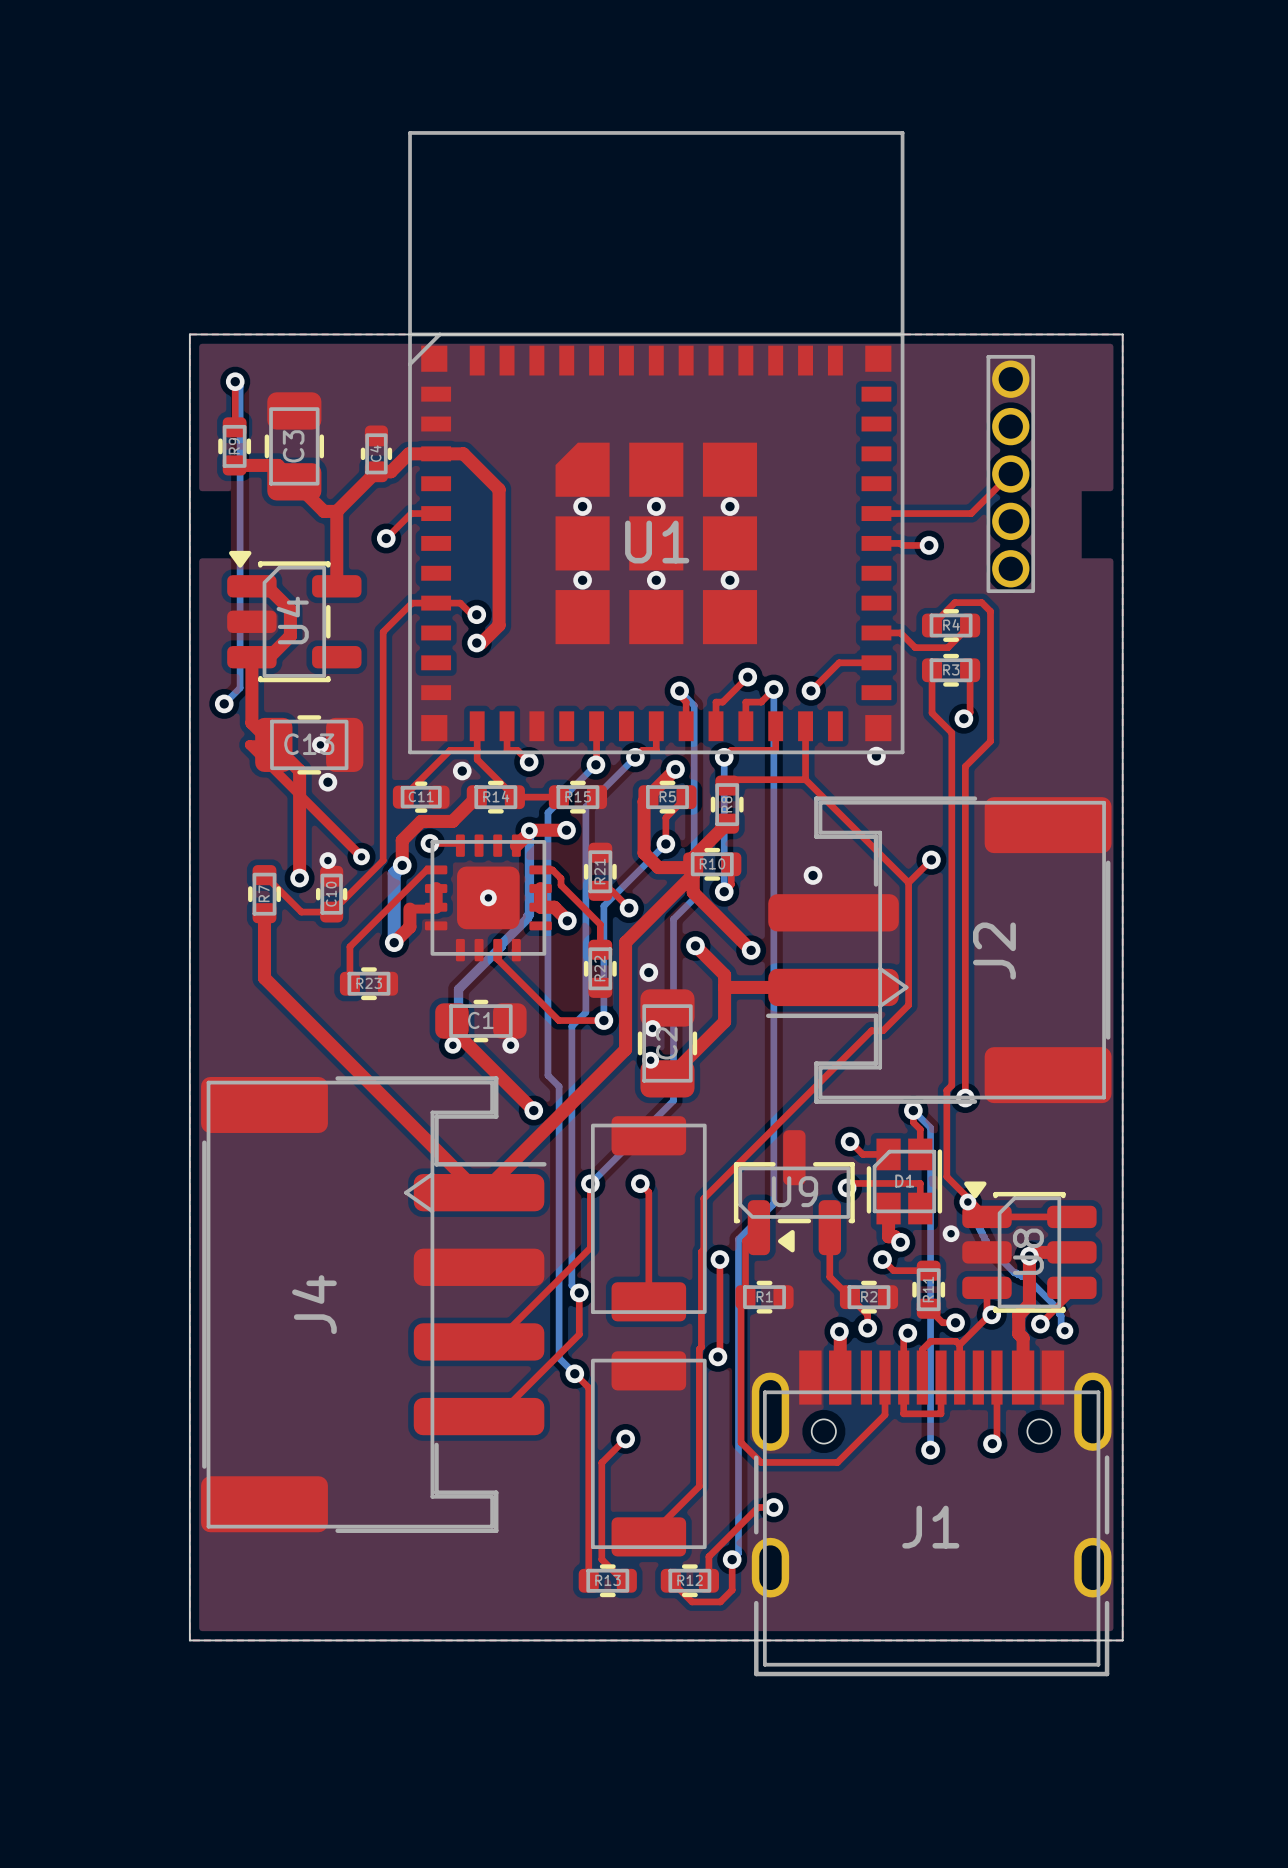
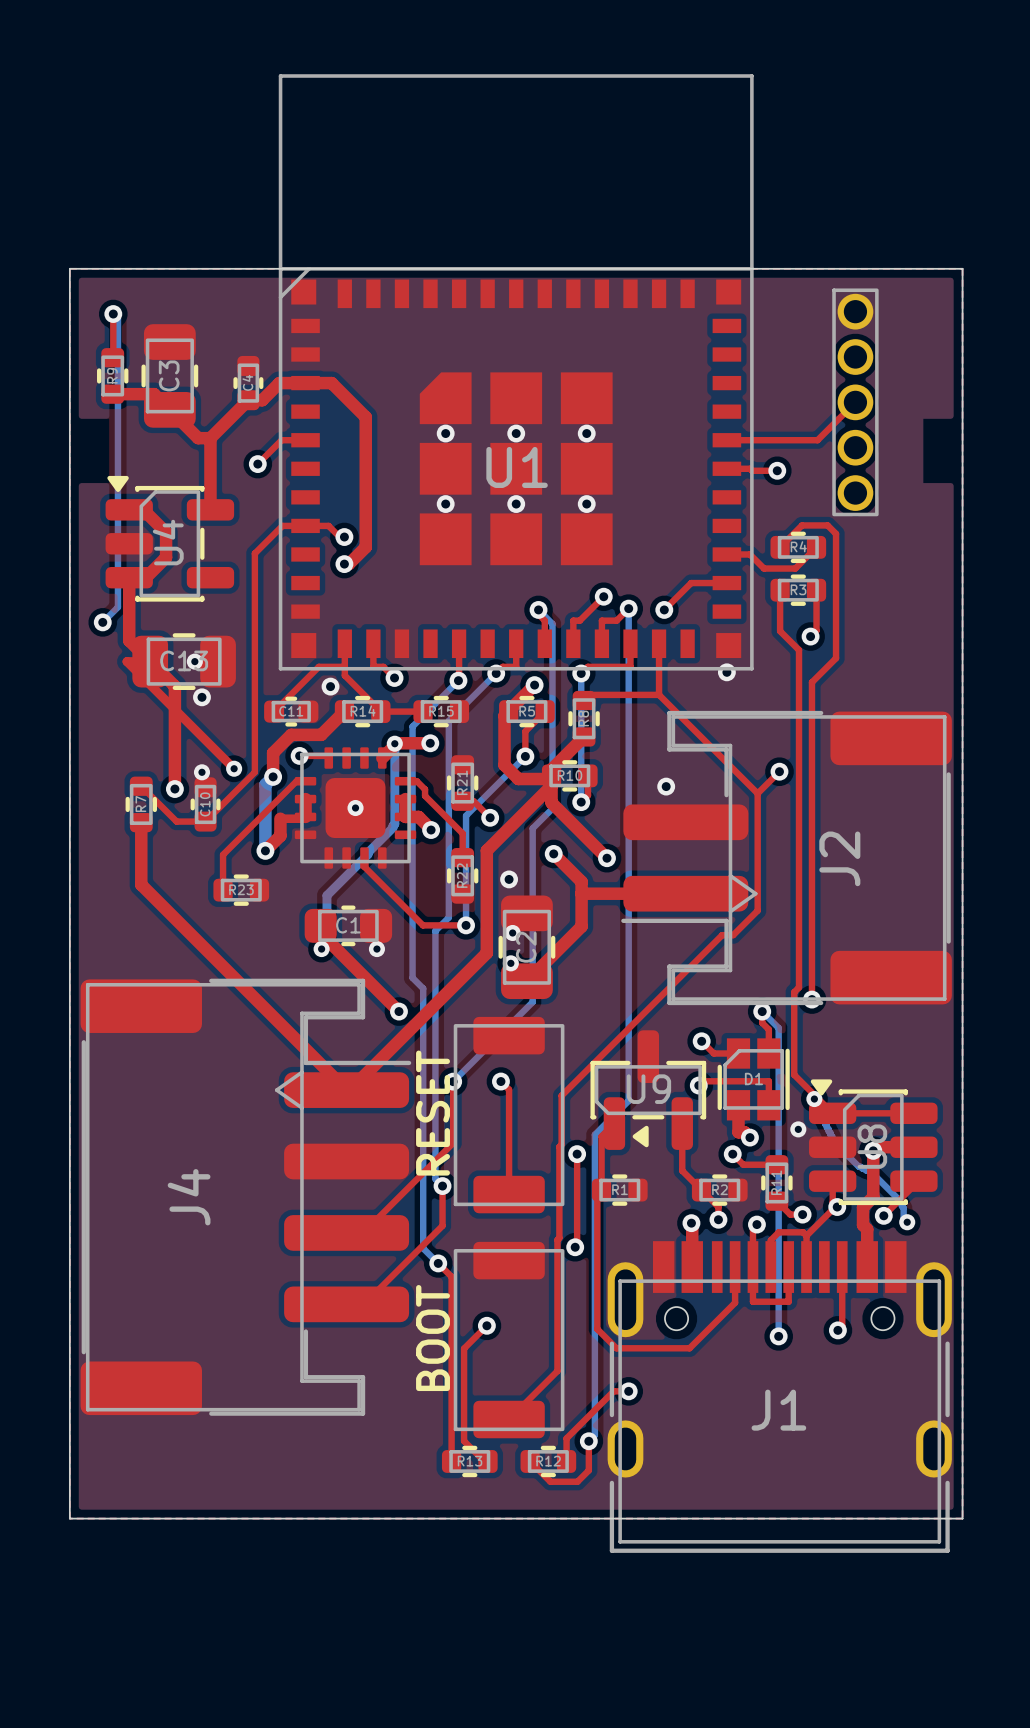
text: none -> RESET (433, 1113)
text: none -> BOOT (433, 1338)

